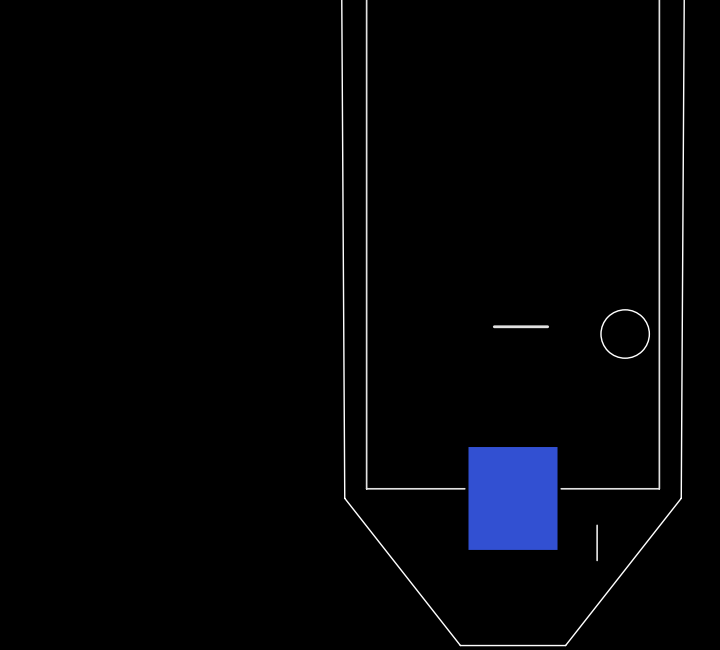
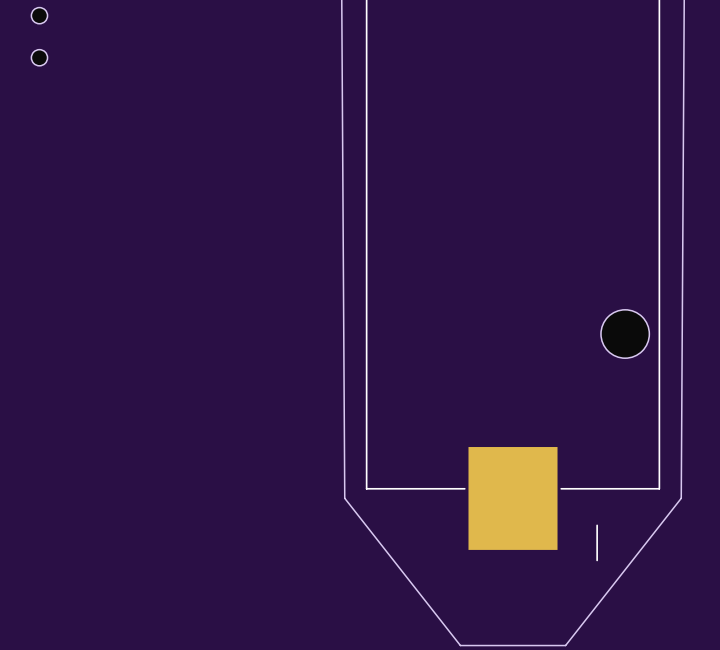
part: none -> (39, 15)
part: none -> (39, 57)
text: - (520, 326) -> none

